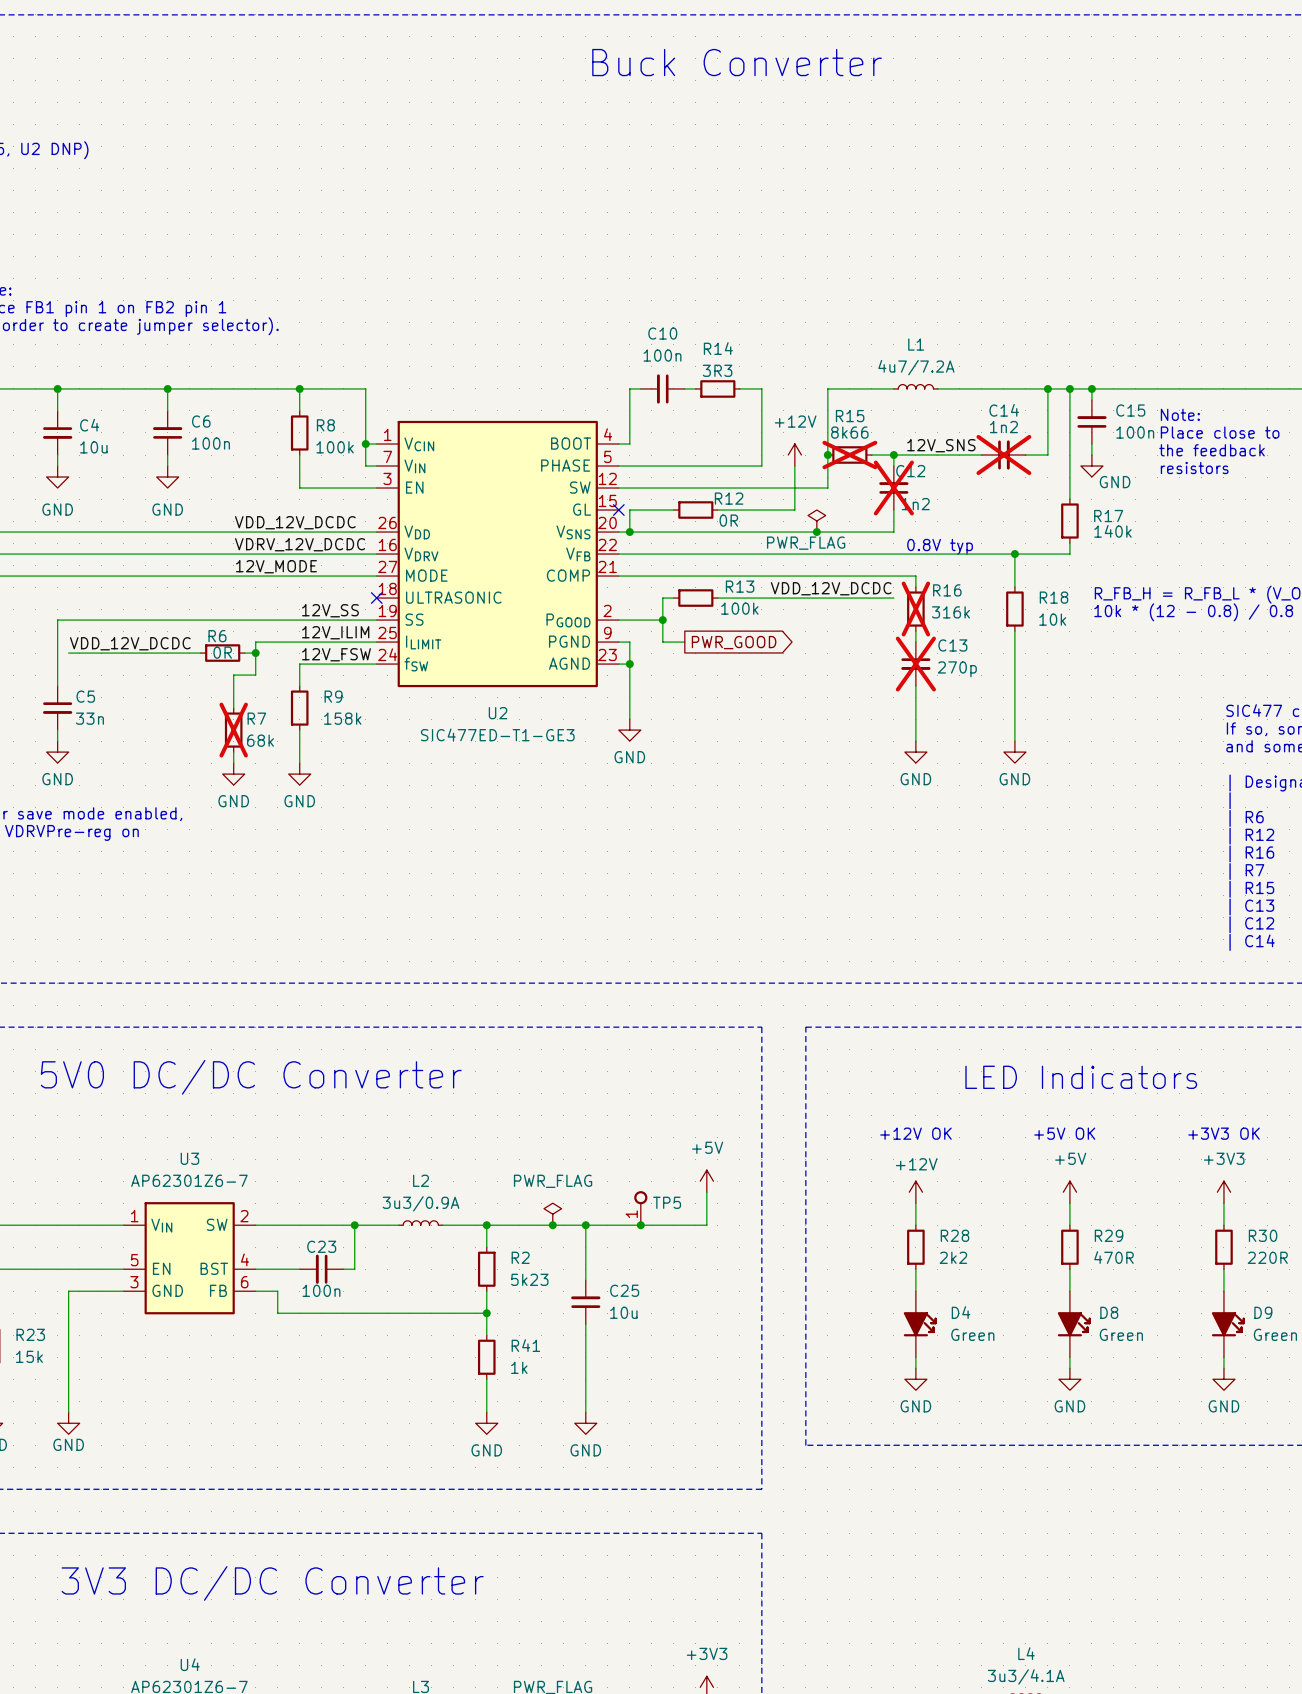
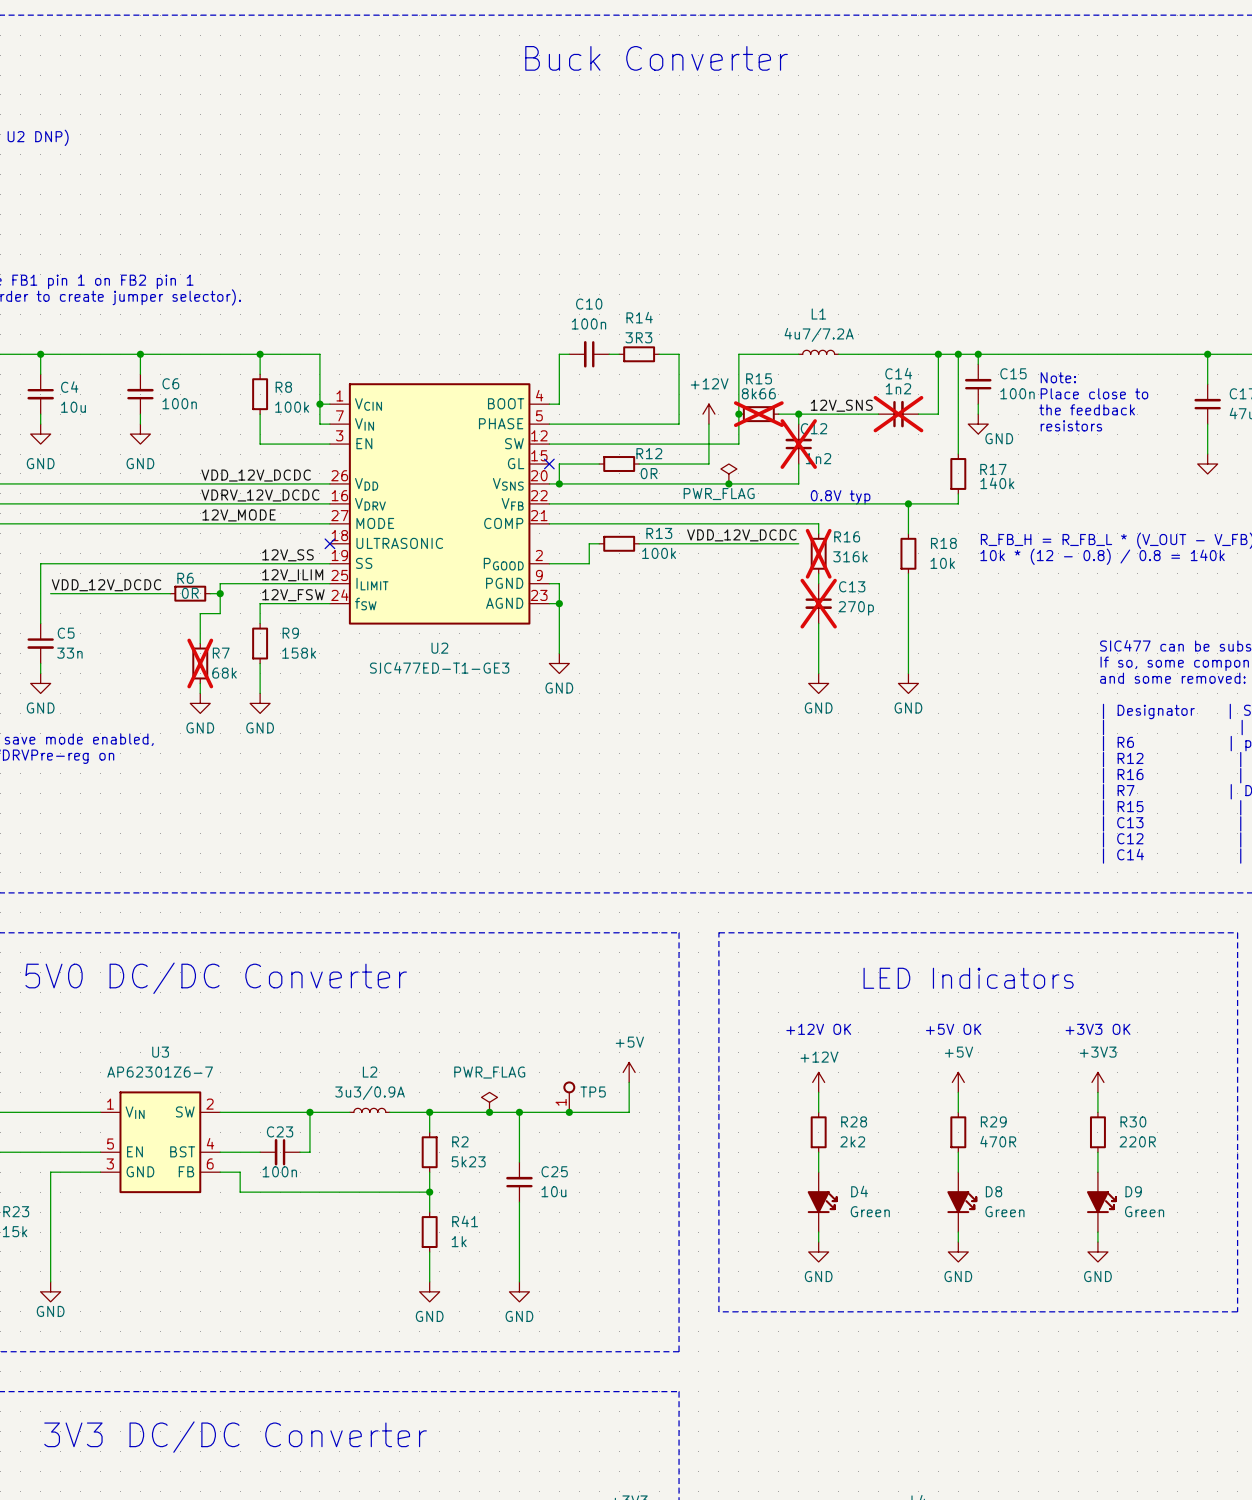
wire: (662, 620) (662, 642) (684, 642) -> none
junction: (662, 620) -> none
global label: PWR_GOOD (734, 642) -> none

